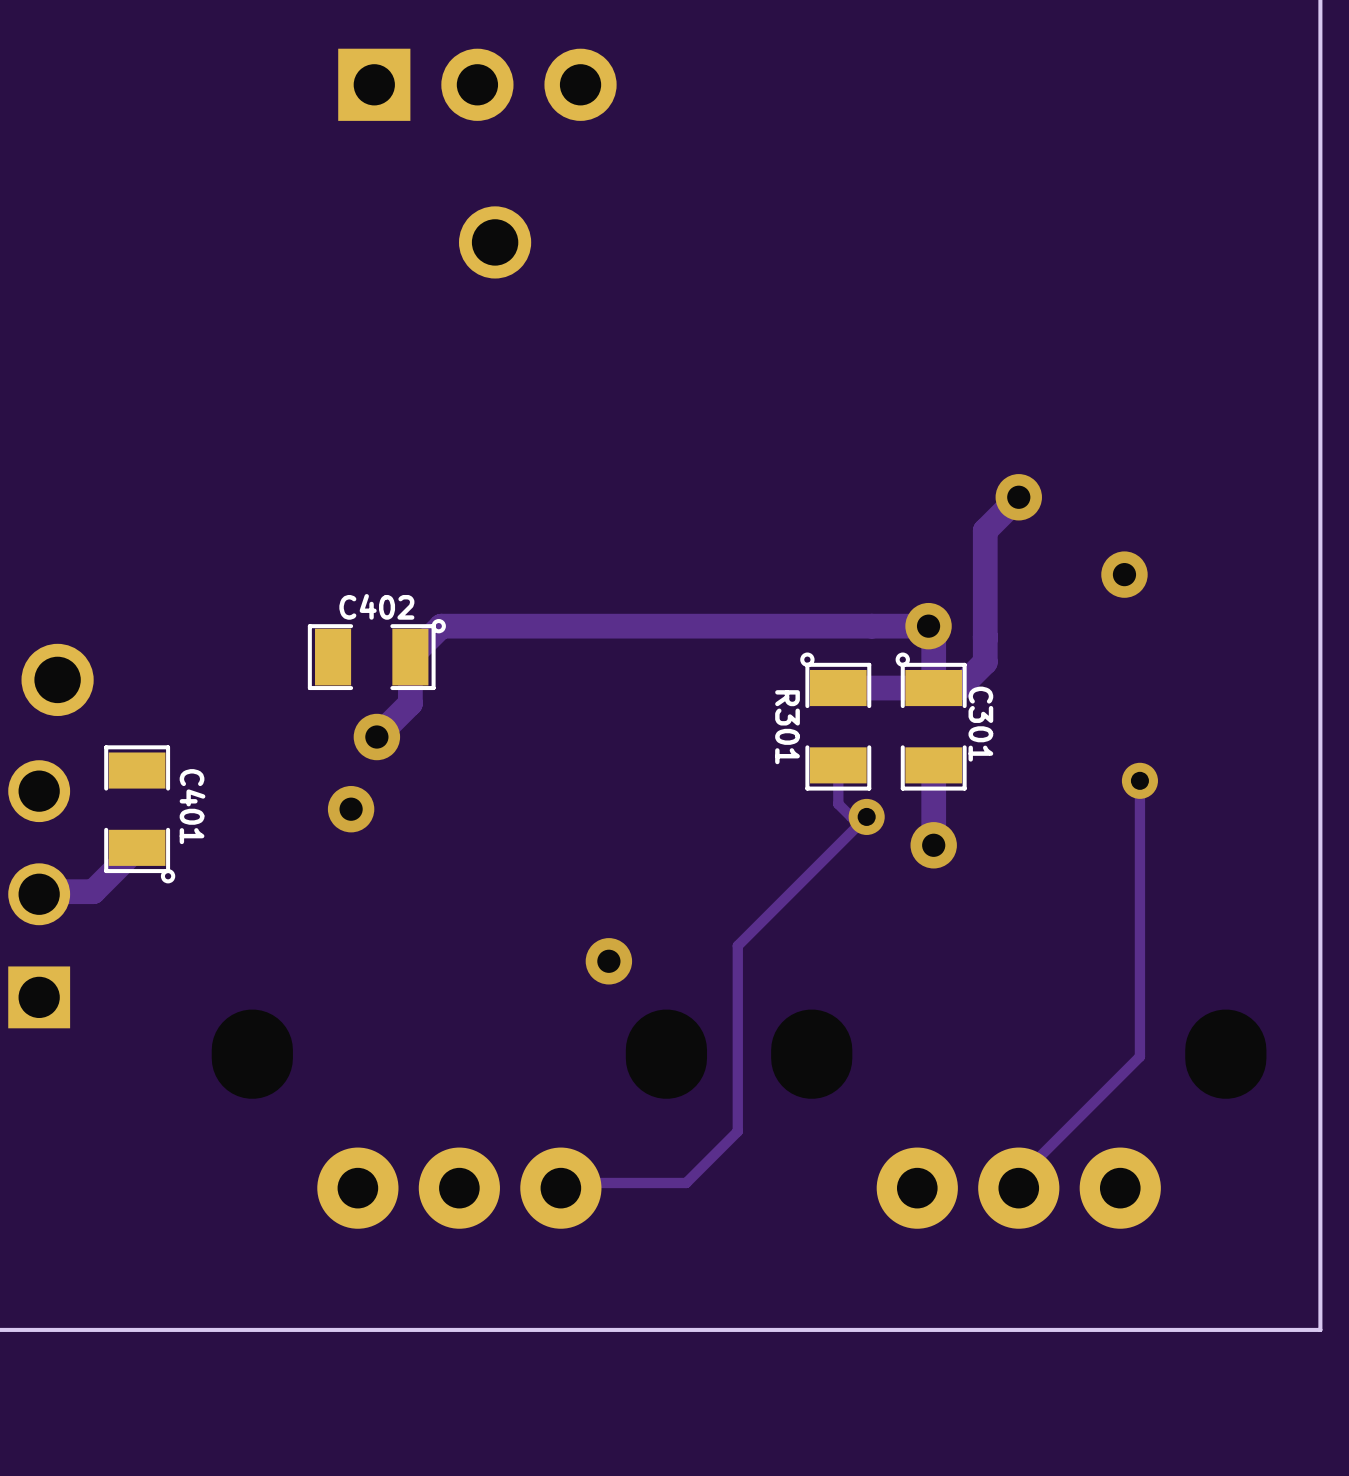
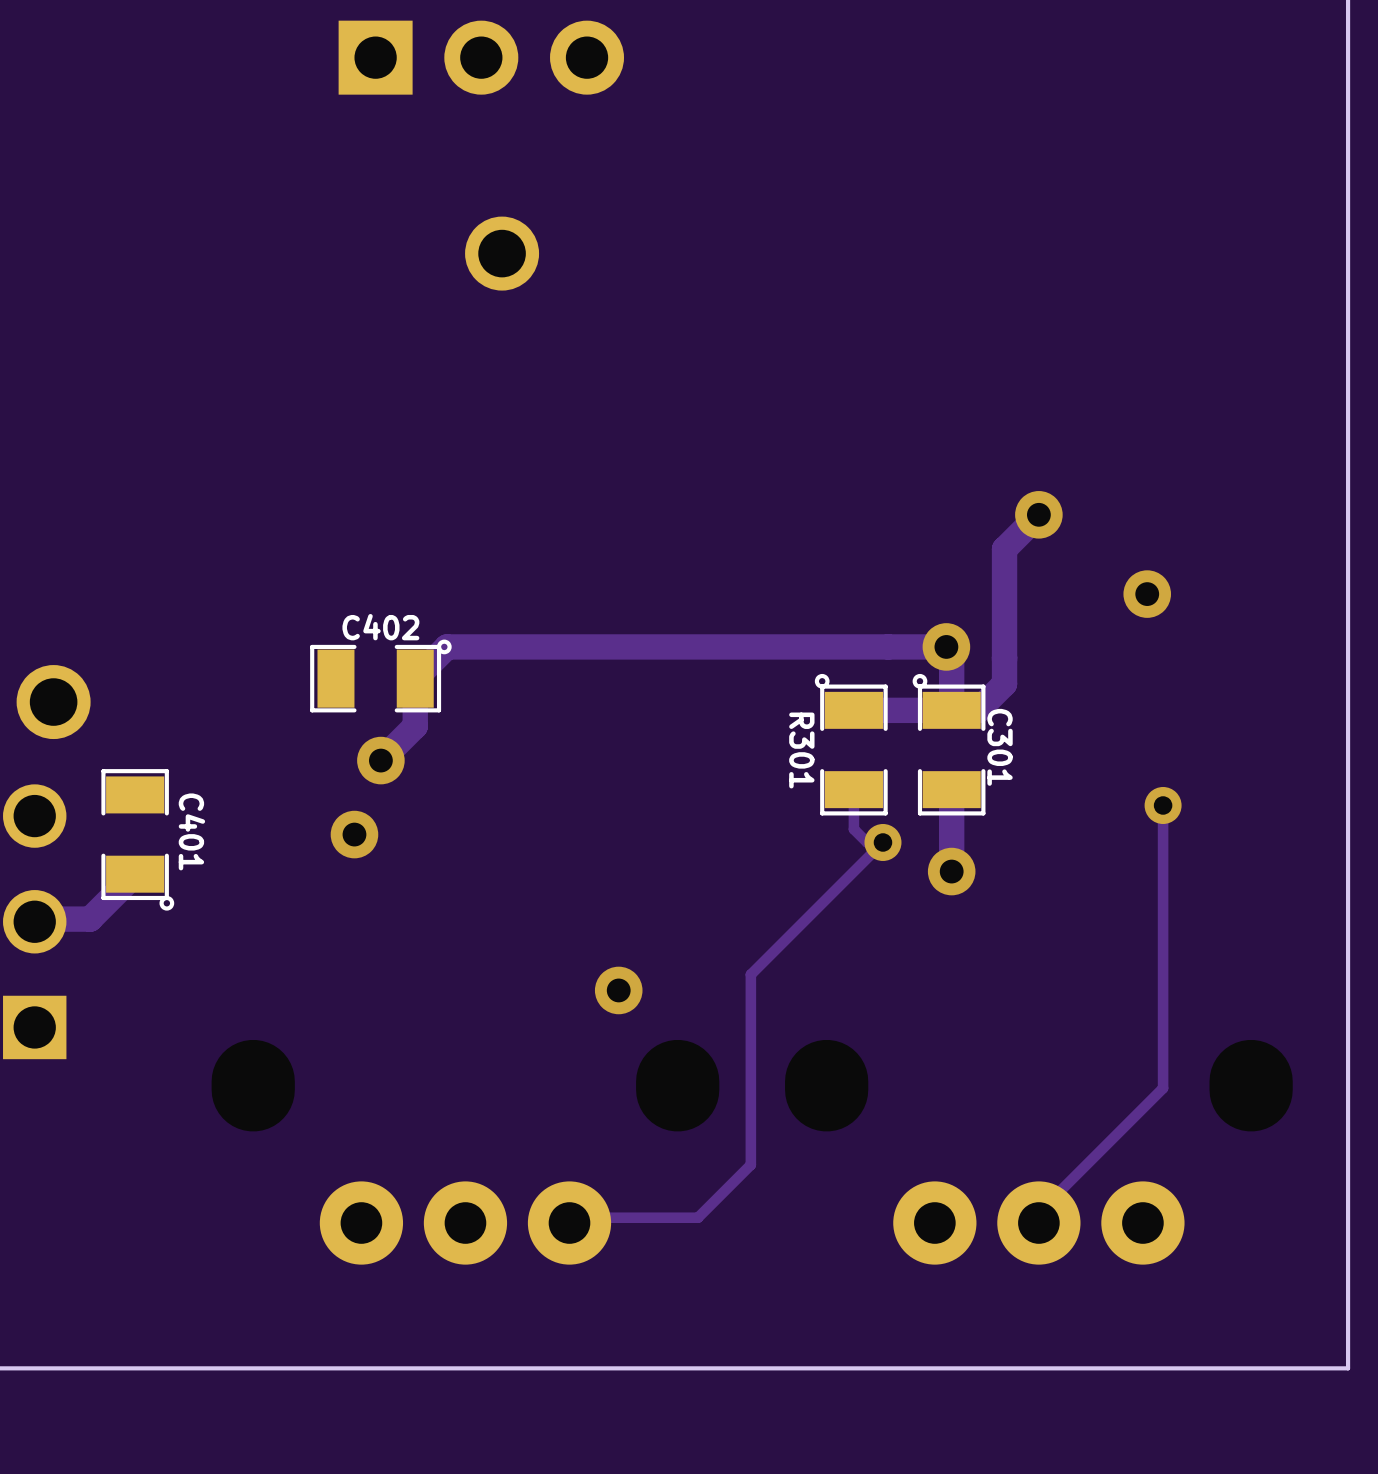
part position: (477, 84) -> (481, 57)

